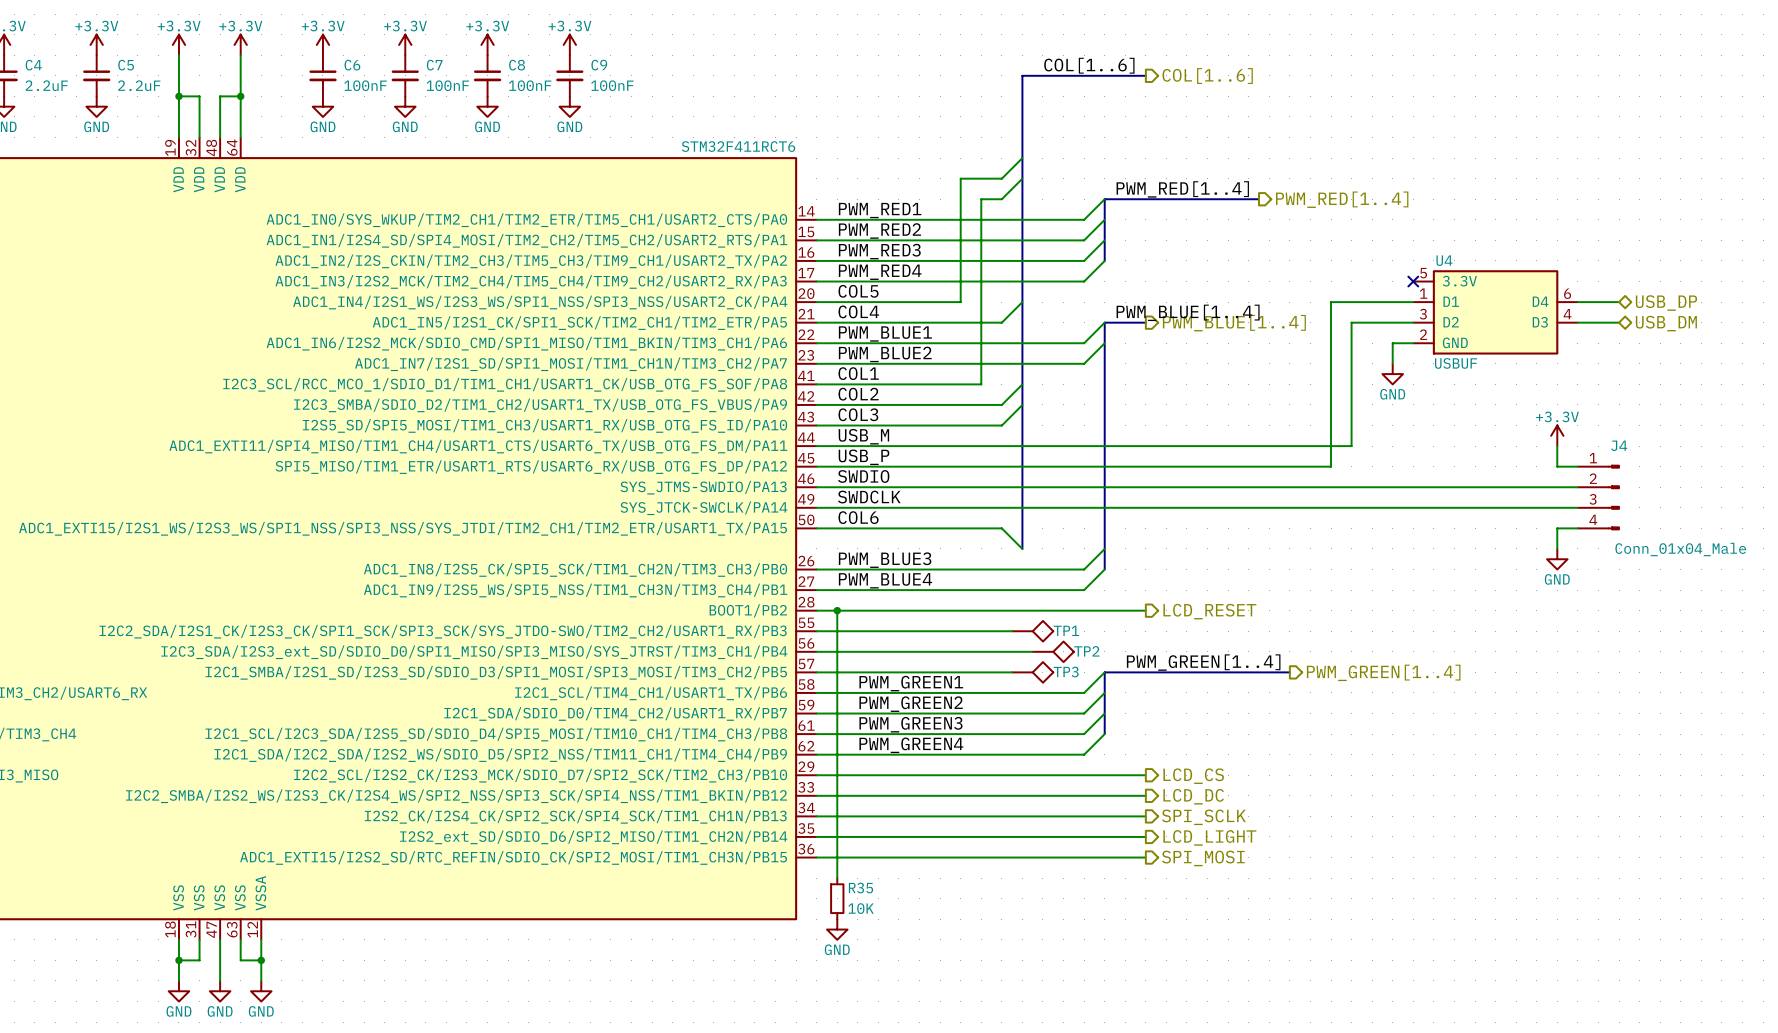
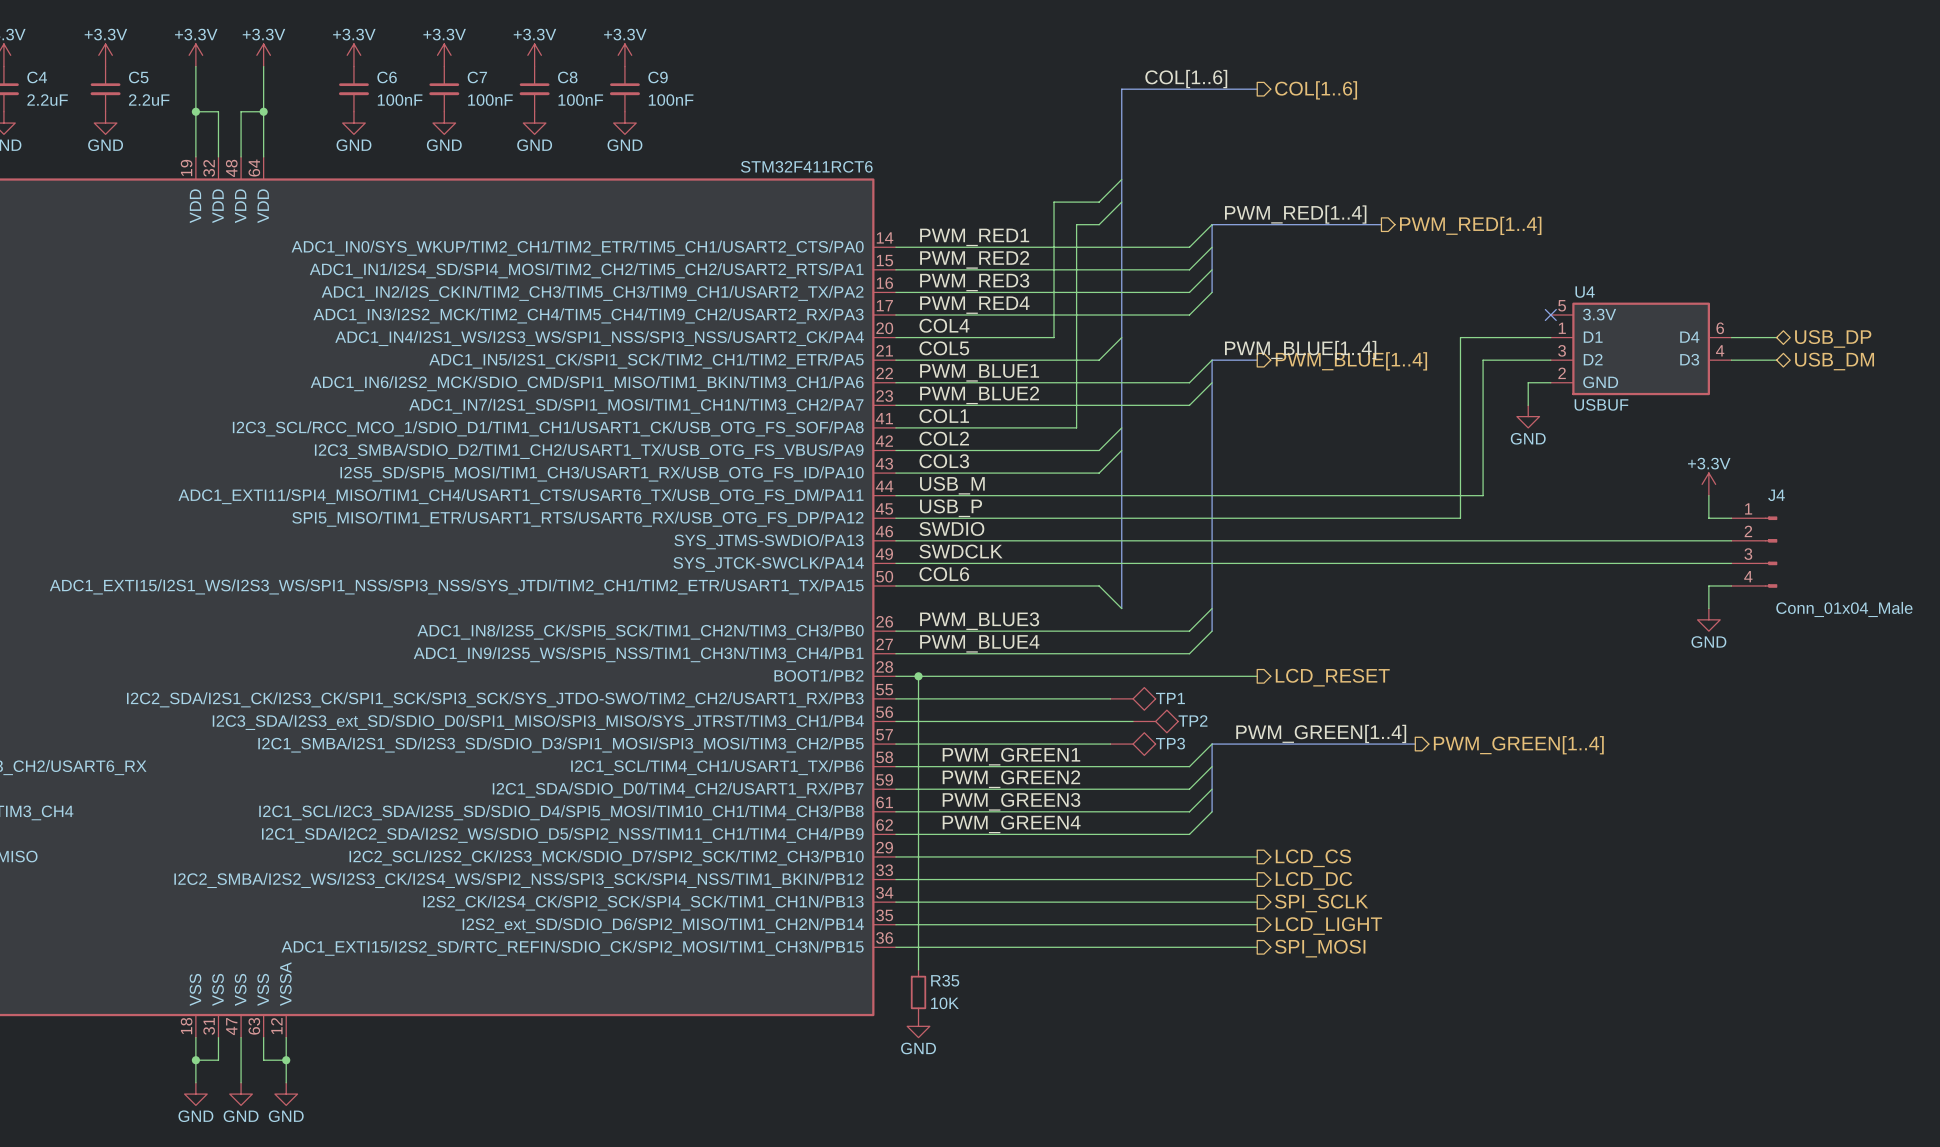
label: COL5 (858, 291) -> COL4 (944, 325)
label: COL4 (858, 311) -> COL5 (944, 348)

